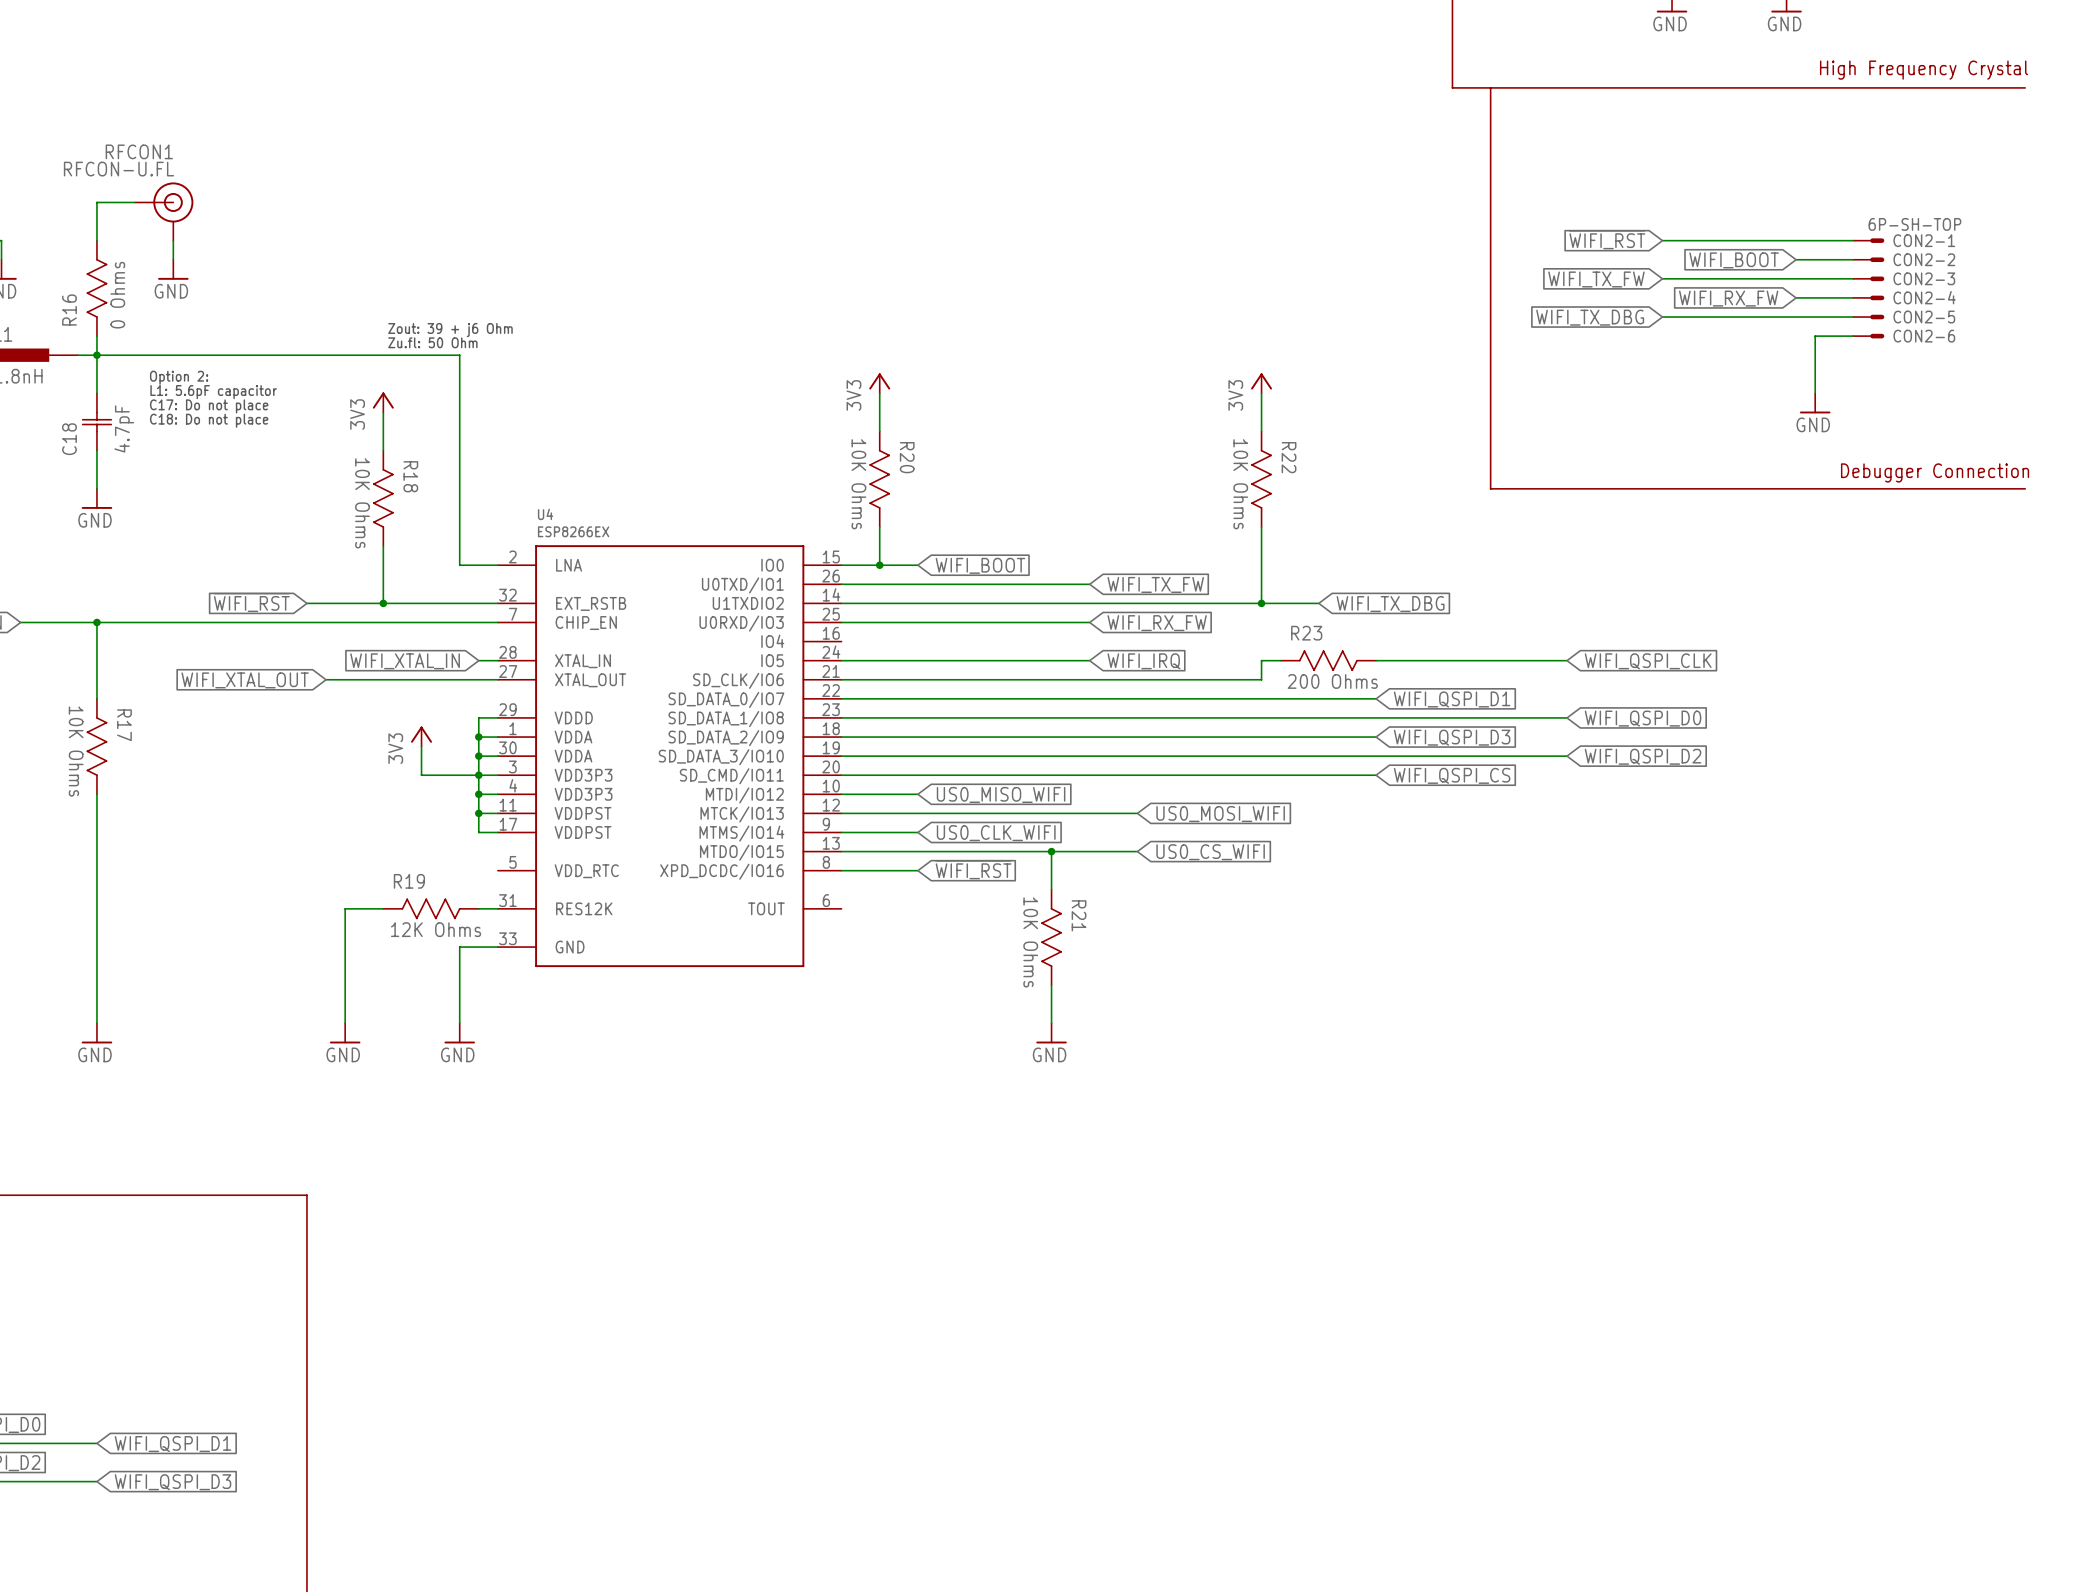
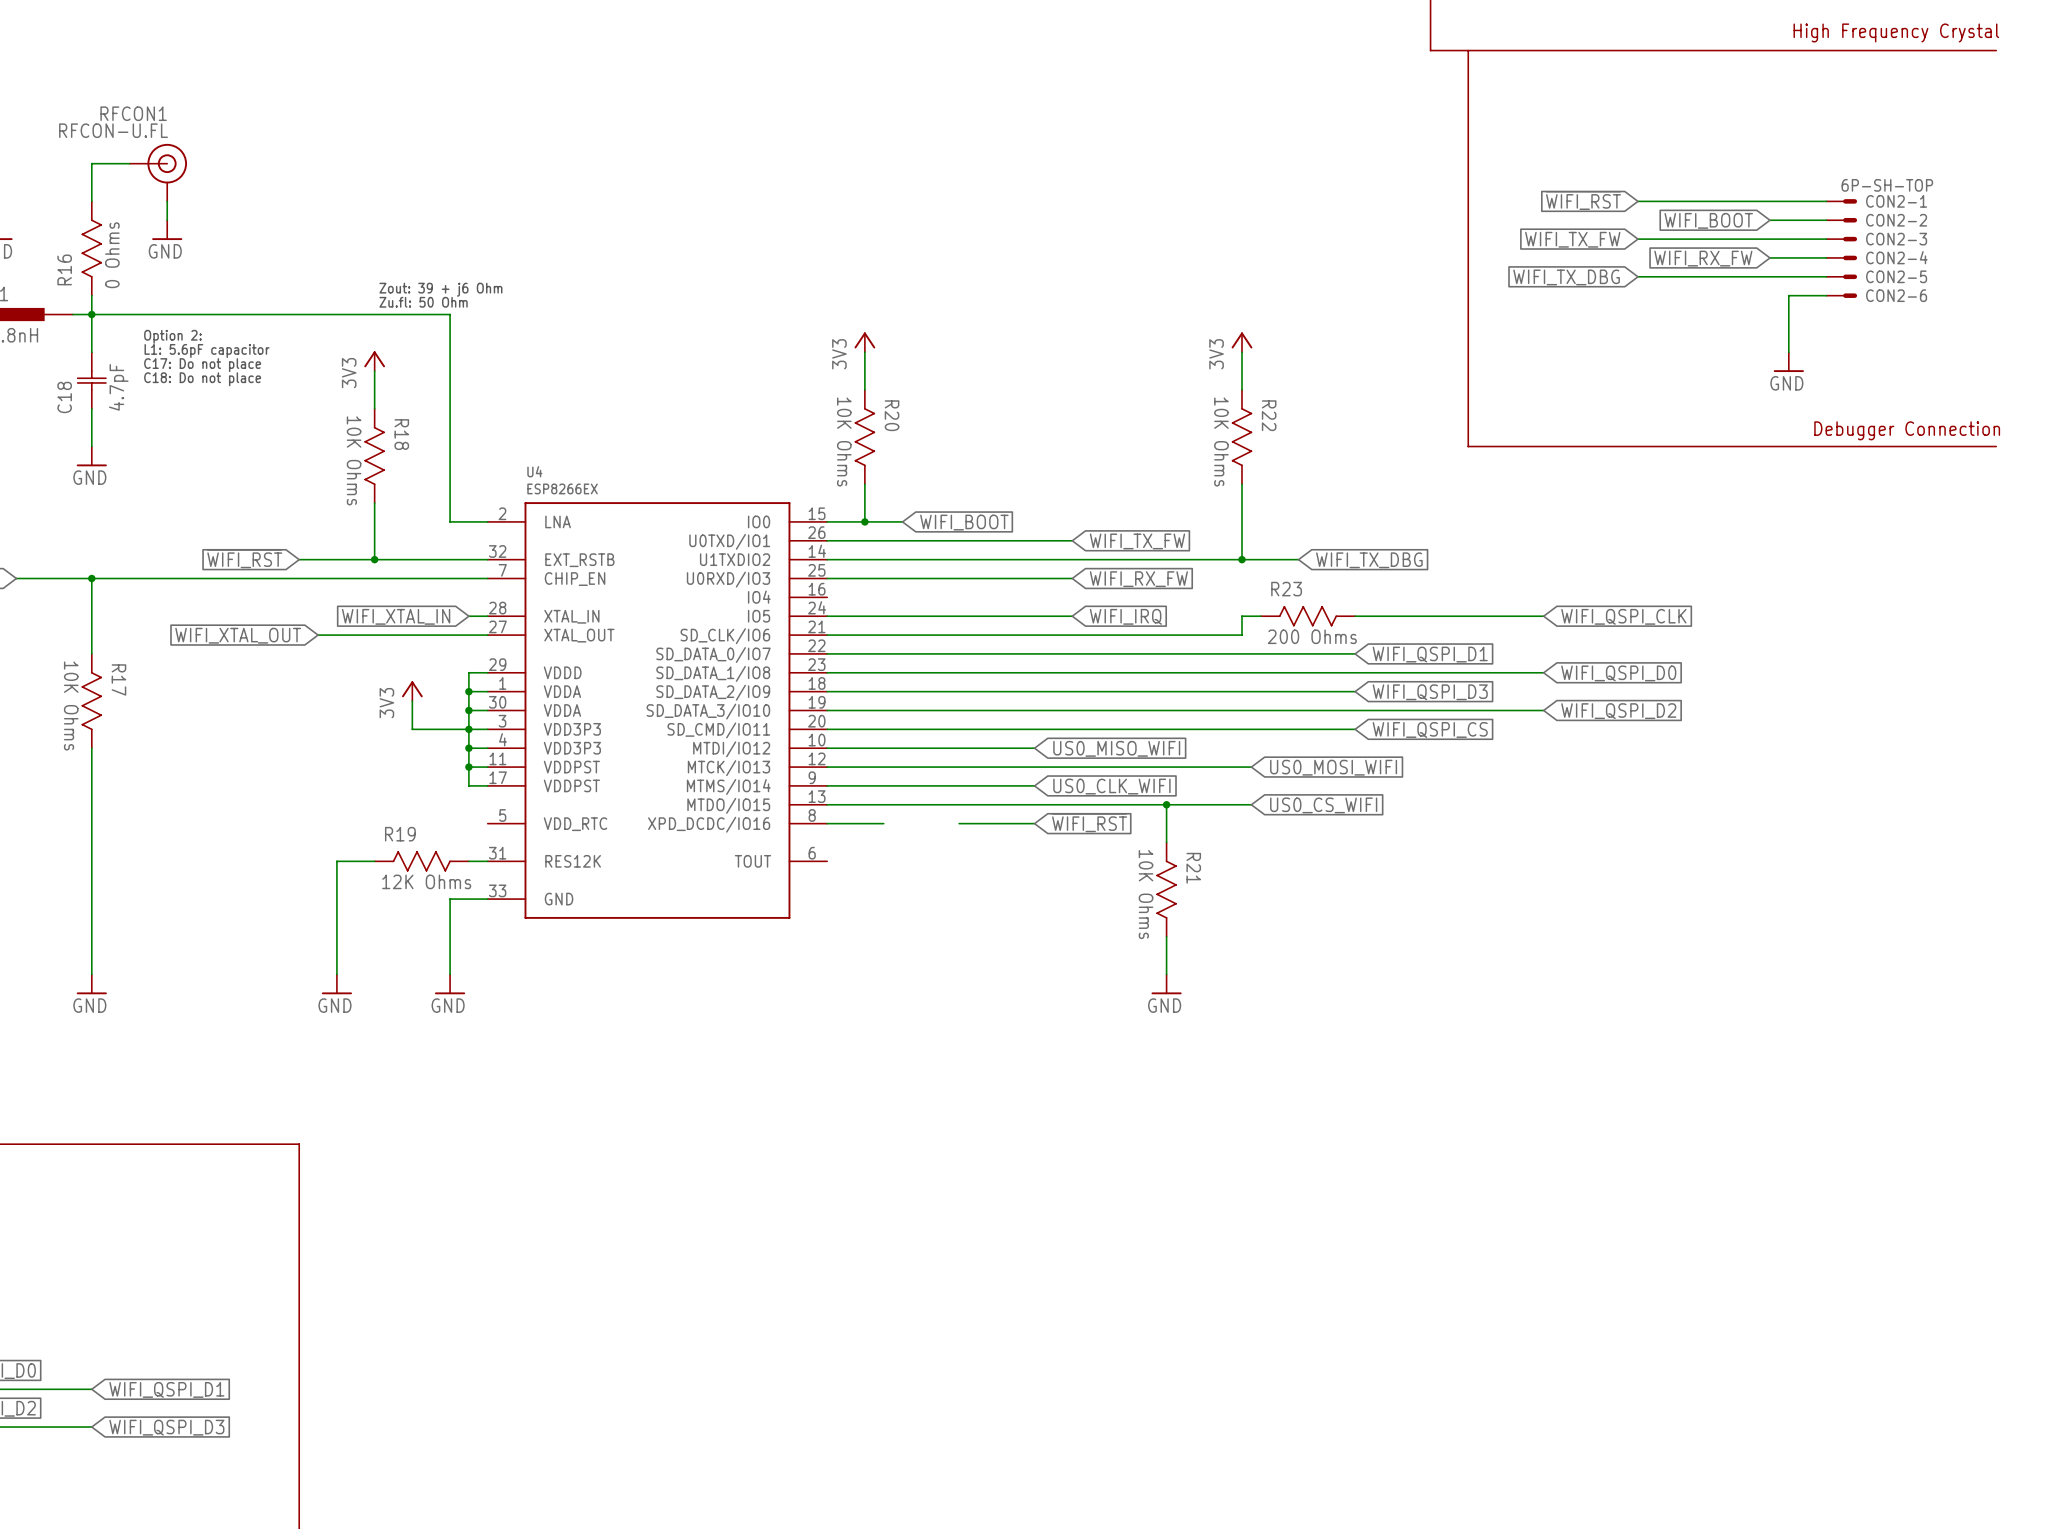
wire: none -> (902, 748) (1034, 748)
global label position: US0_MISO_WIFI (1001, 794) -> US0_MISO_WIFI (1116, 748)
wire: none -> (1119, 767) (1251, 767)
global label position: US0_MOSI_WIFI (1220, 814) -> US0_MOSI_WIFI (1333, 767)
wire: none -> (902, 785) (1034, 785)
global label position: US0_CLK_WIFI (996, 833) -> US0_CLK_WIFI (1111, 786)
wire: (1051, 851) (1051, 889) -> (1166, 804) (1166, 842)
junction: (1051, 851) -> none
wire: none -> (1119, 804) (1251, 804)
junction: none -> (1166, 804)
global label position: US0_CS_WIFI (1210, 852) -> US0_CS_WIFI (1323, 805)
global label position: ~{WIFI_RST} (973, 869) -> ~{WIFI_RST} (1089, 822)
wire: (898, 870) (917, 870) -> none
wire: none -> (959, 823) (1034, 823)
R21 position: (1051, 937) -> (1166, 889)
wire: (1051, 985) (1051, 1023) -> (1166, 936) (1166, 974)
power symbol position: GND (1051, 1033) -> GND (1166, 984)

